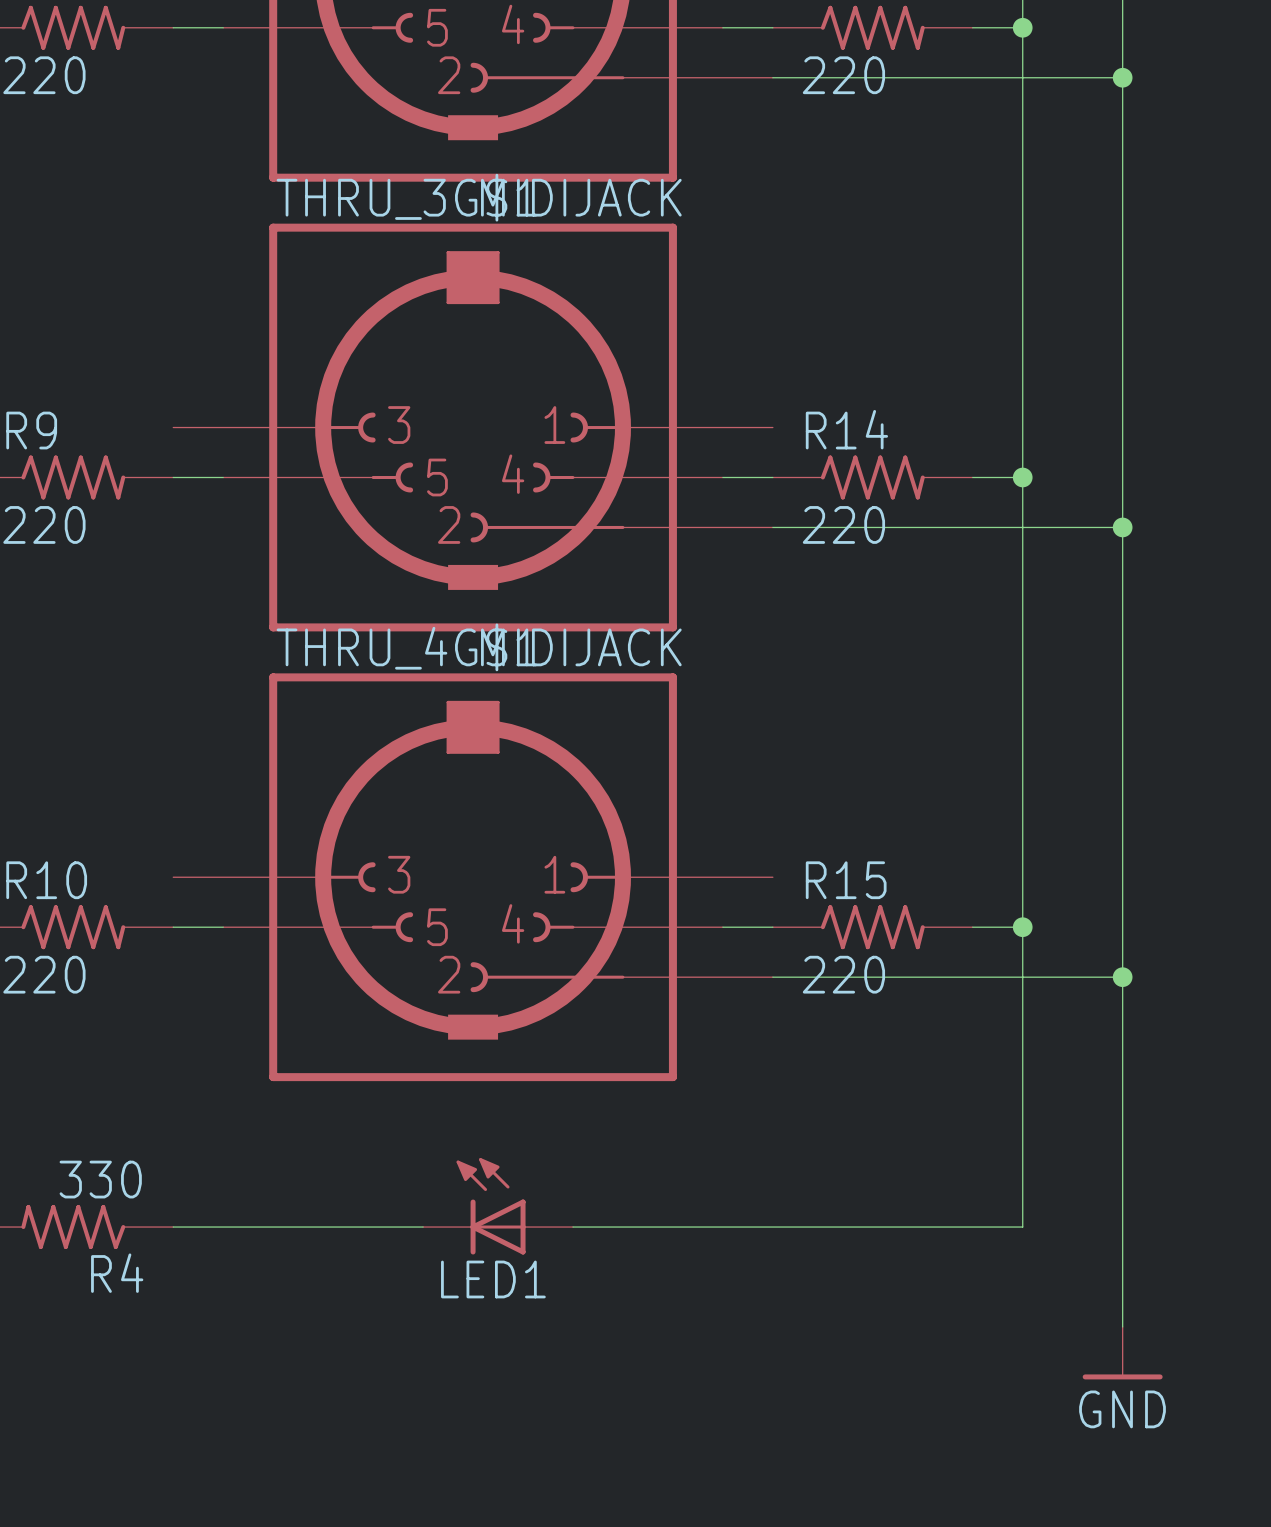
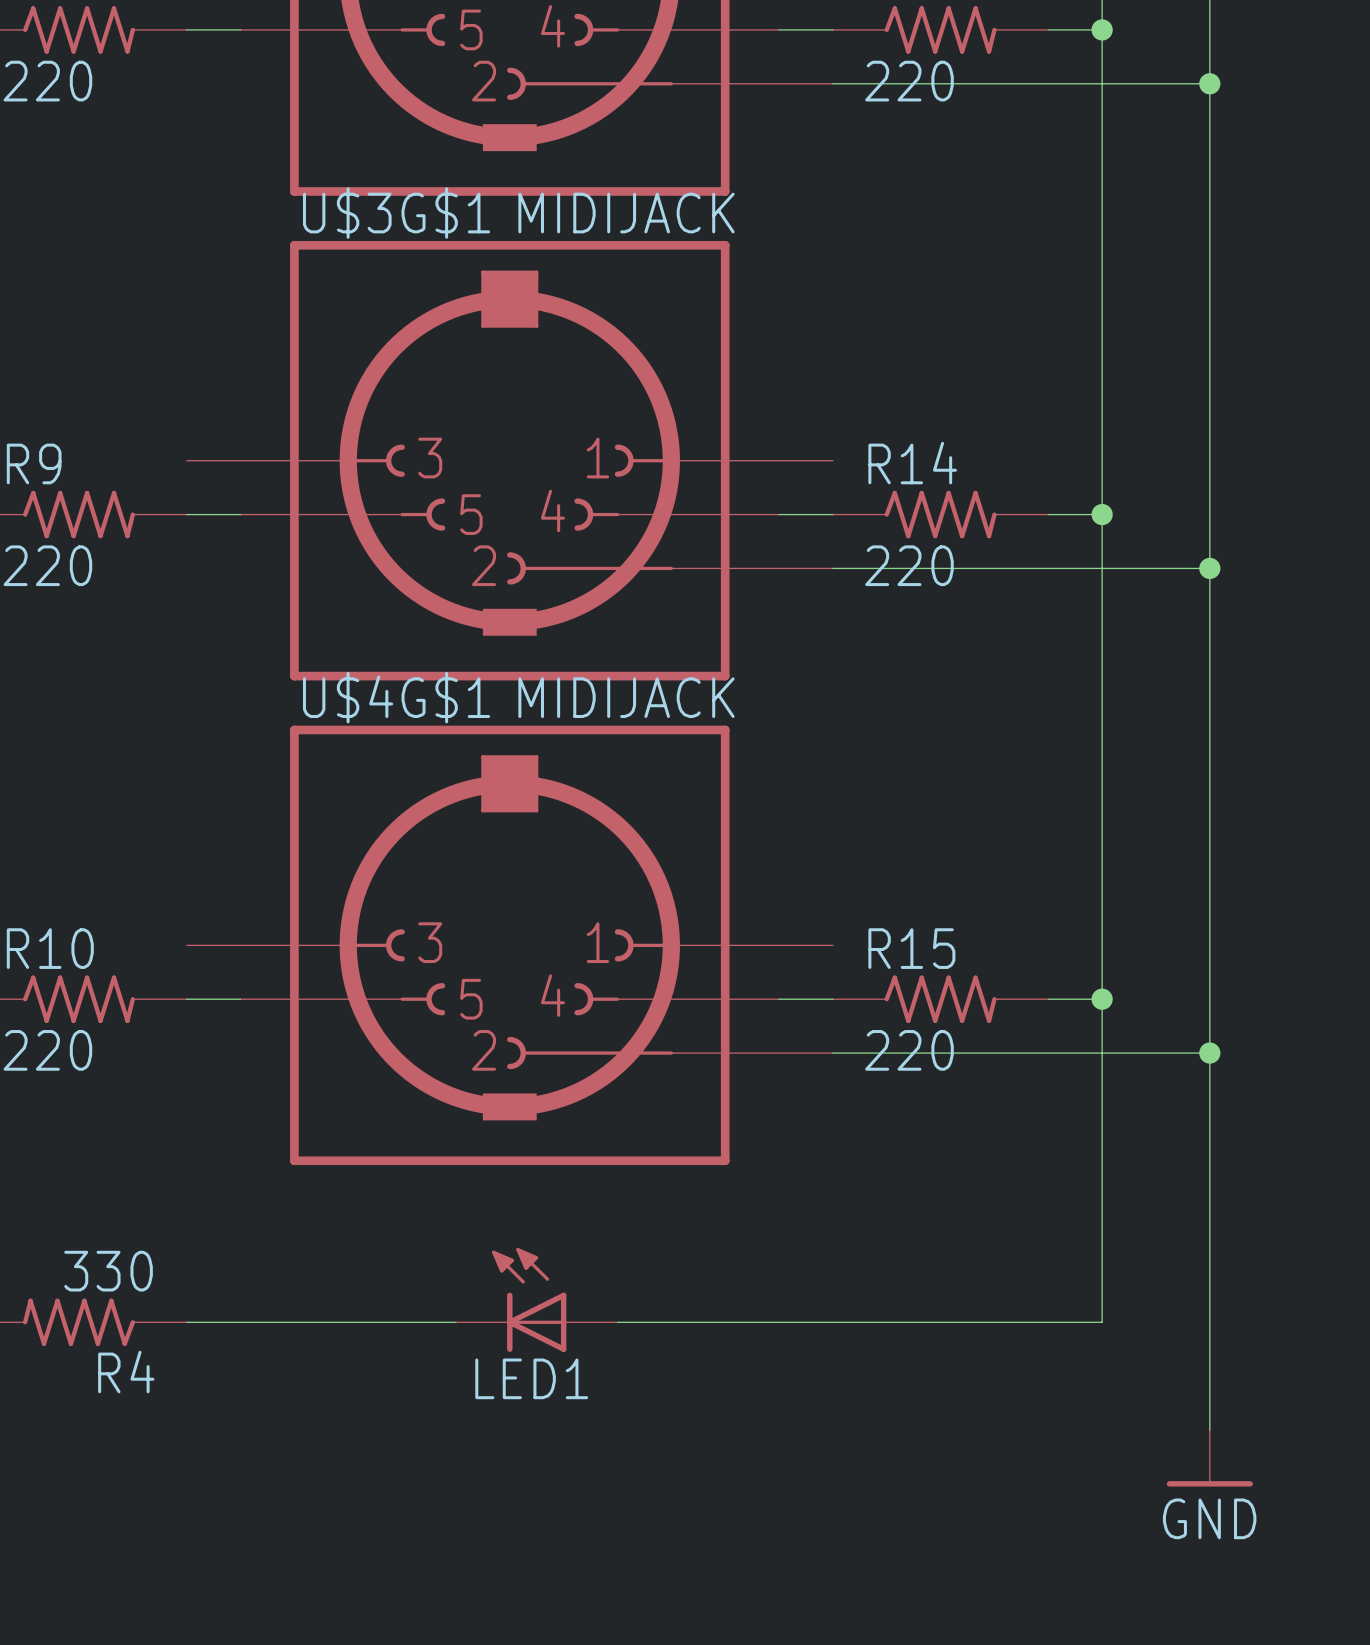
THRU_3G$1 name: THRU_3G$1 (406, 197) -> U$3G$1 (396, 213)
THRU_4G$1 name: THRU_4G$1 (406, 647) -> U$4G$1 (396, 697)

